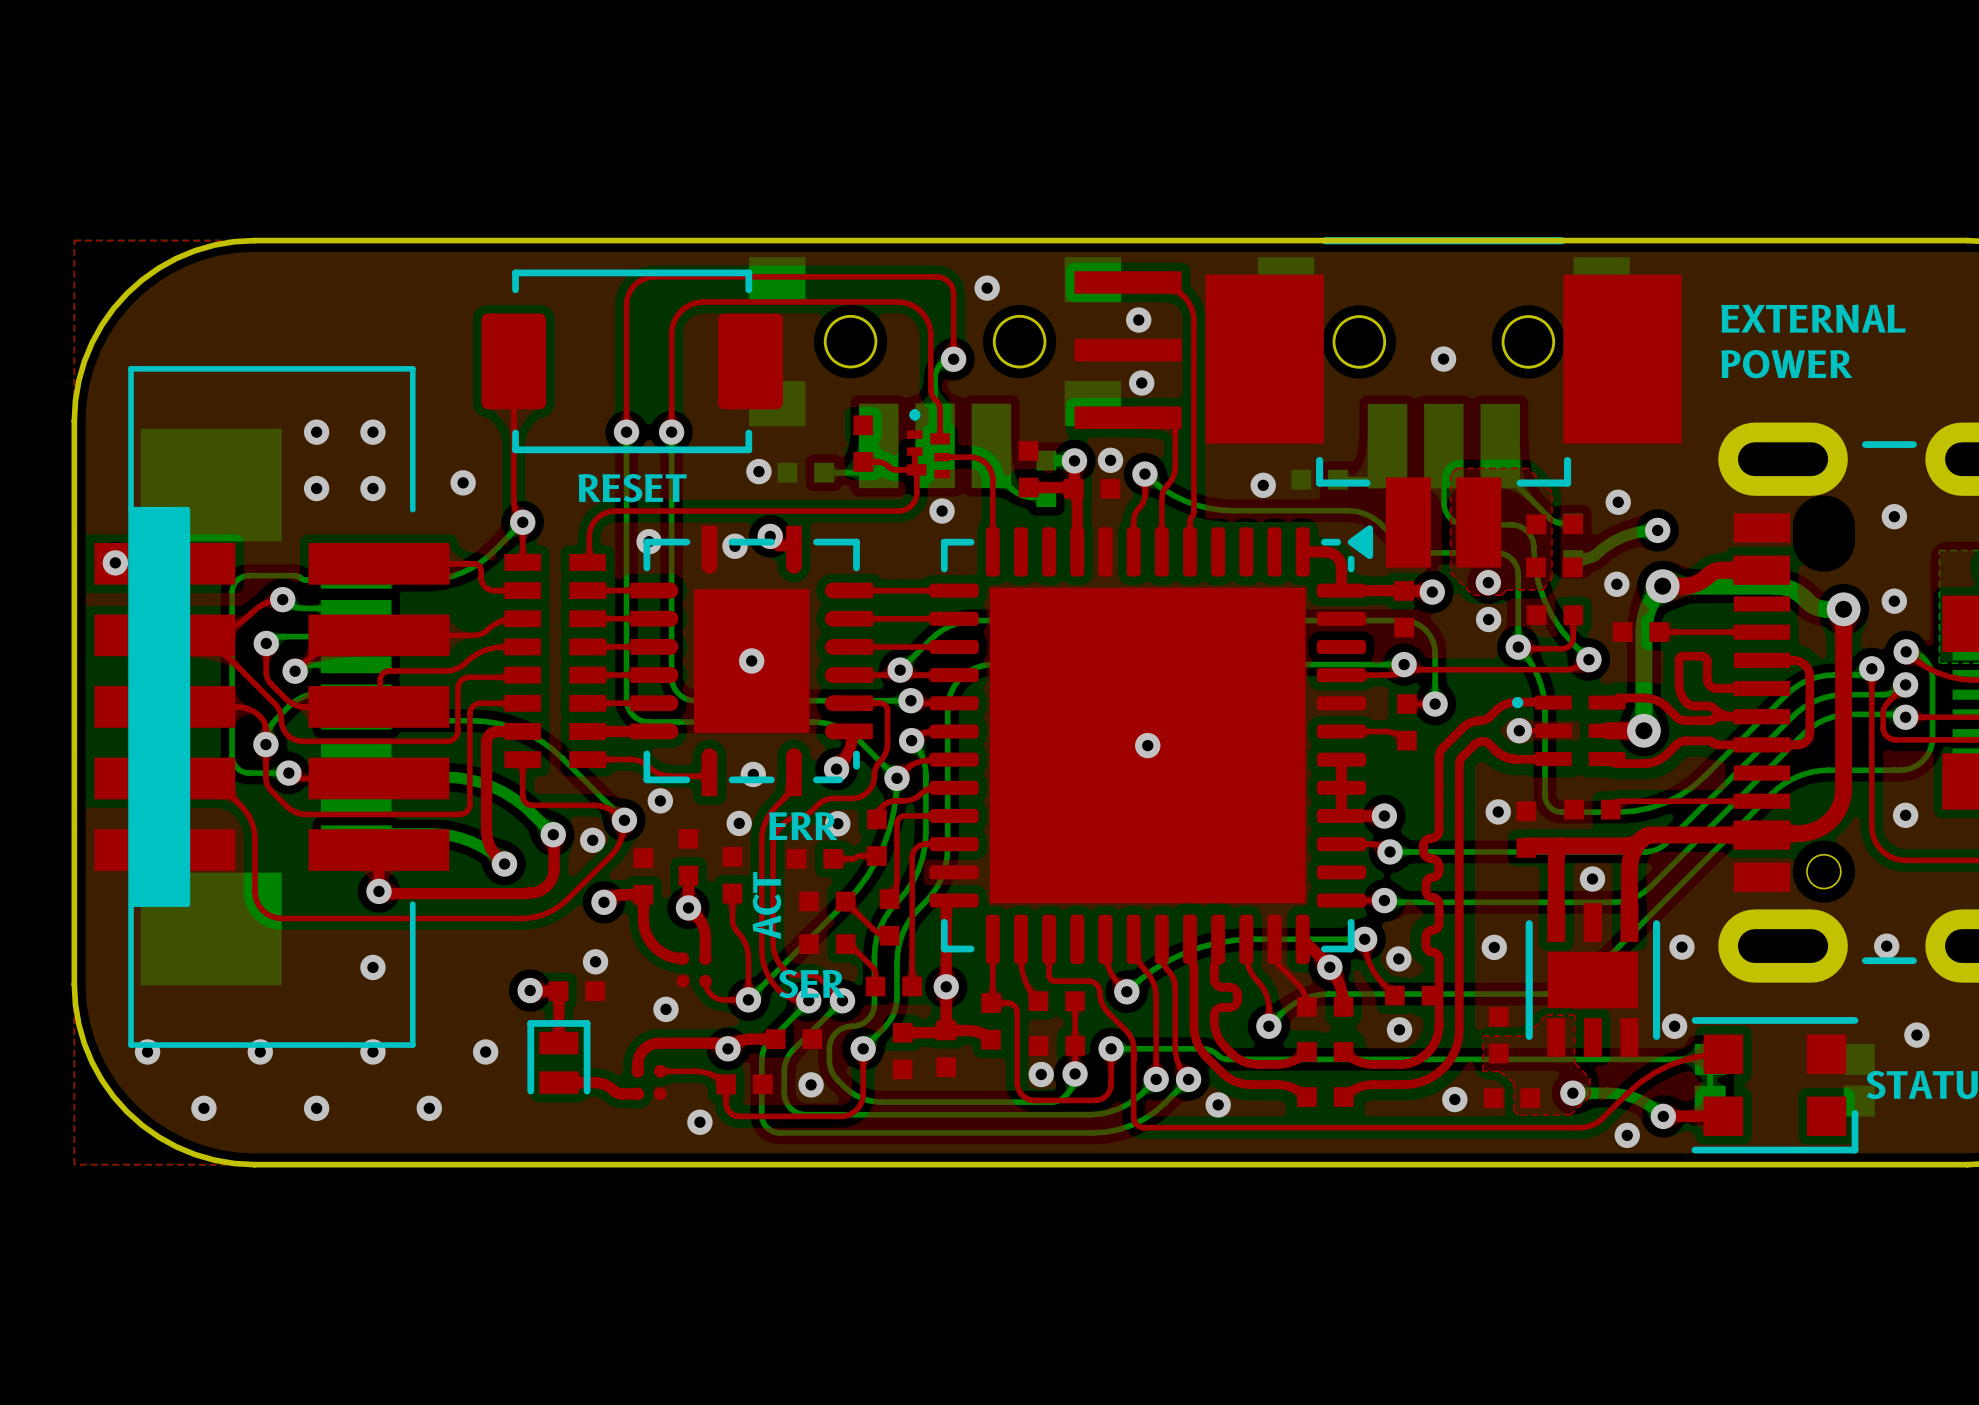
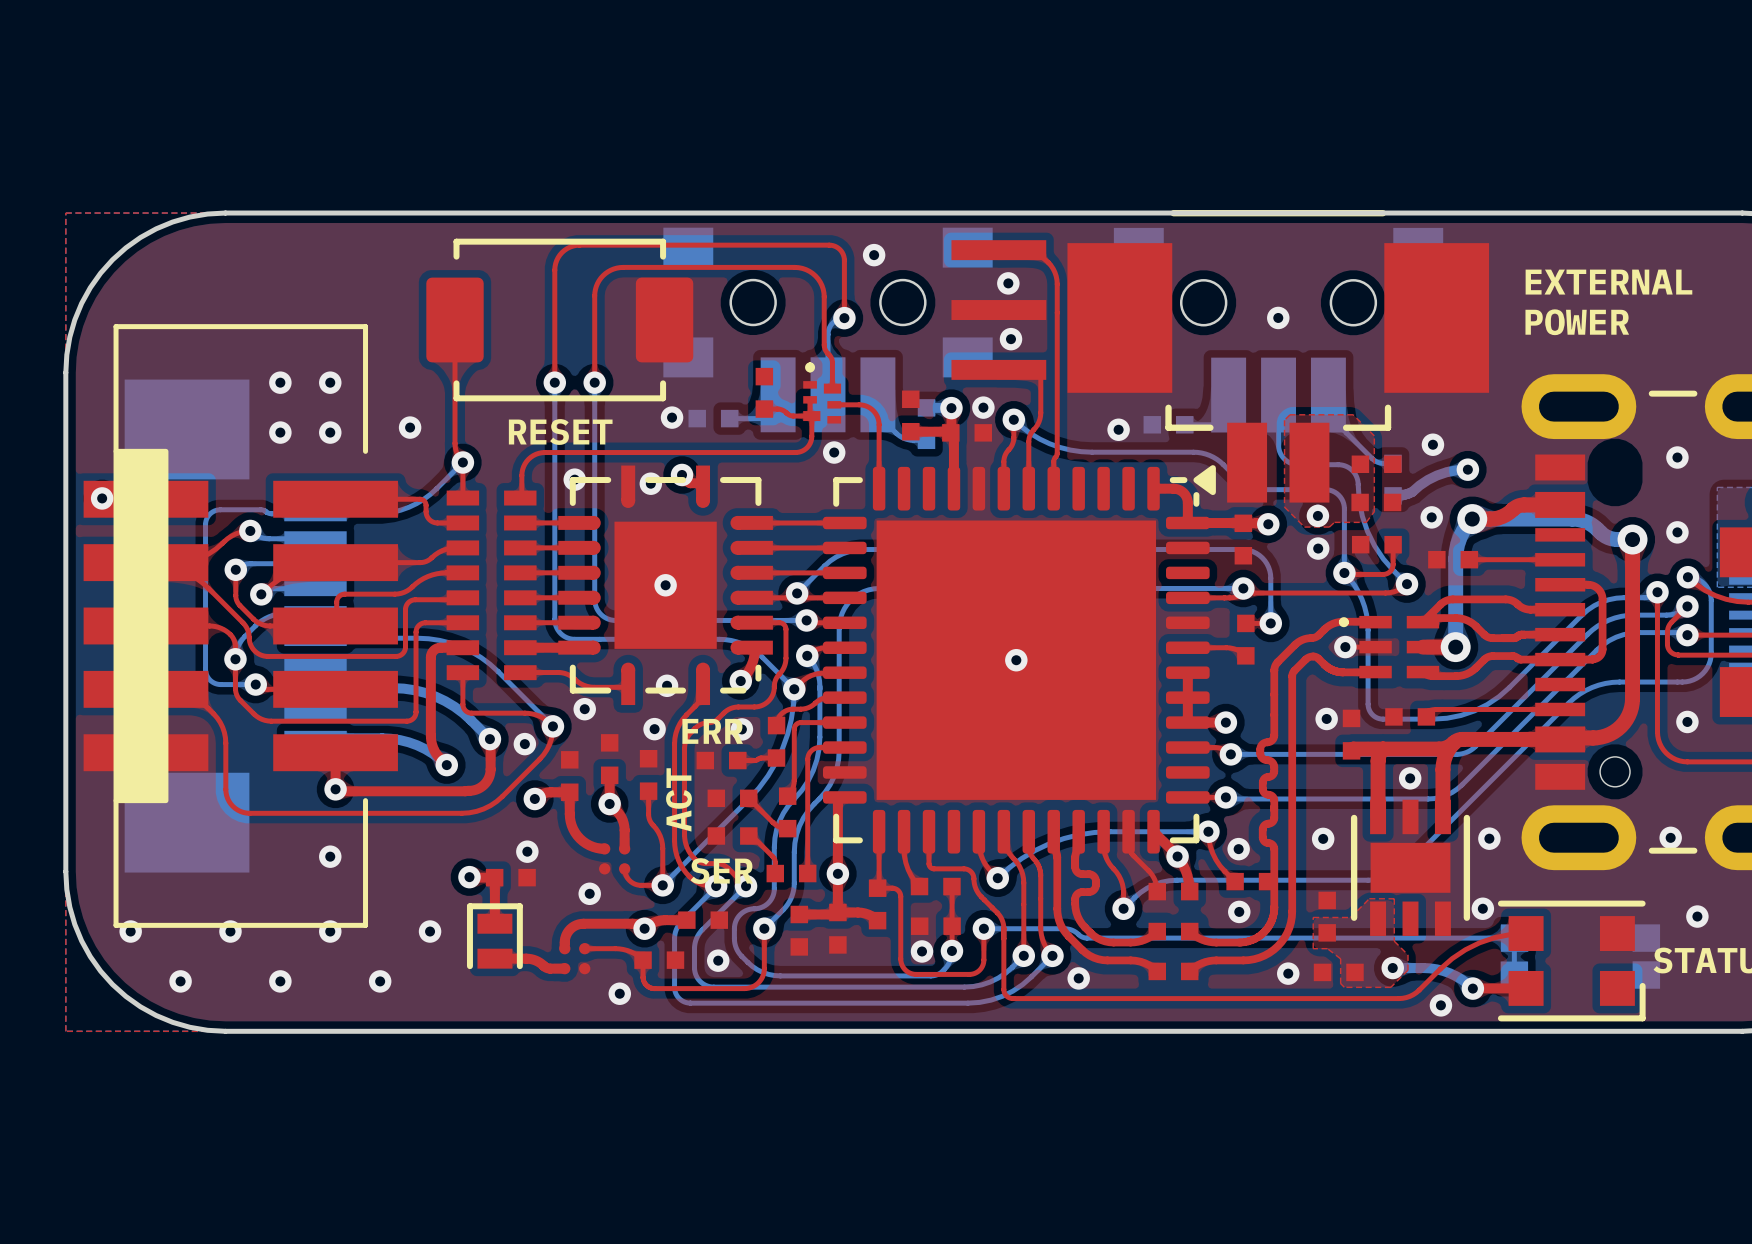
top track: (1728, 688) (1715, 688) (1709, 684) (1707, 661) (1704, 657) (1682, 656) (1679, 658) (1679, 689) (1686, 703) (1692, 705) (1710, 706) (1723, 714) (1733, 716) -> (1530, 609) (1523, 608) (1507, 599) (1451, 599) (1441, 603) (1422, 622) (1432, 618)

